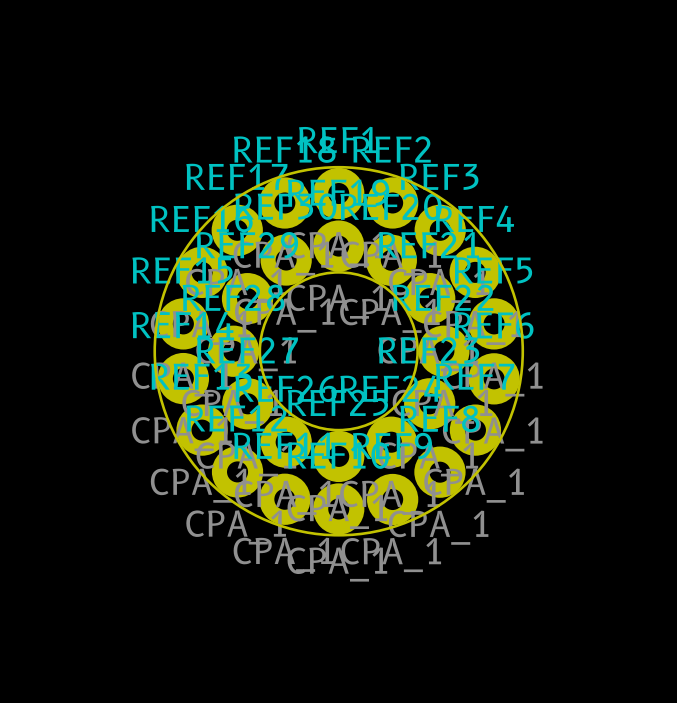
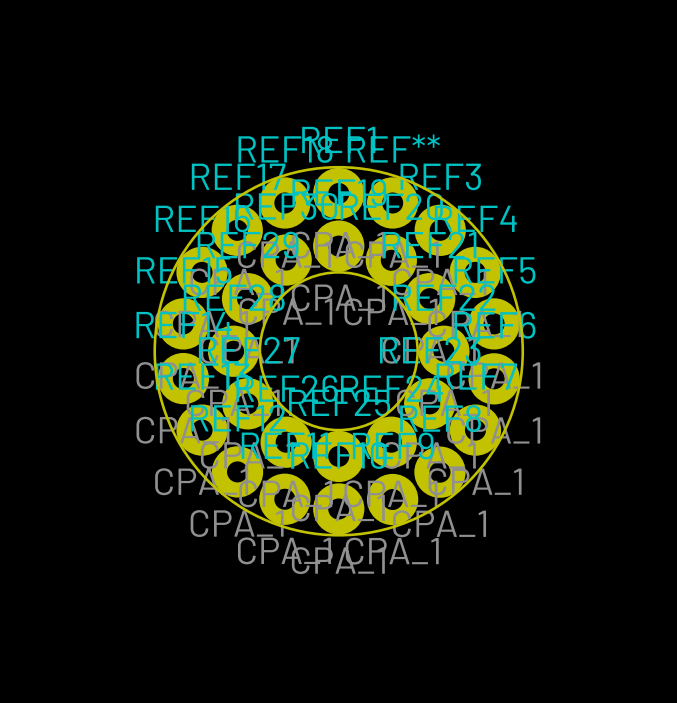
REF2 name: REF2 (391, 149) -> REF** (393, 148)

